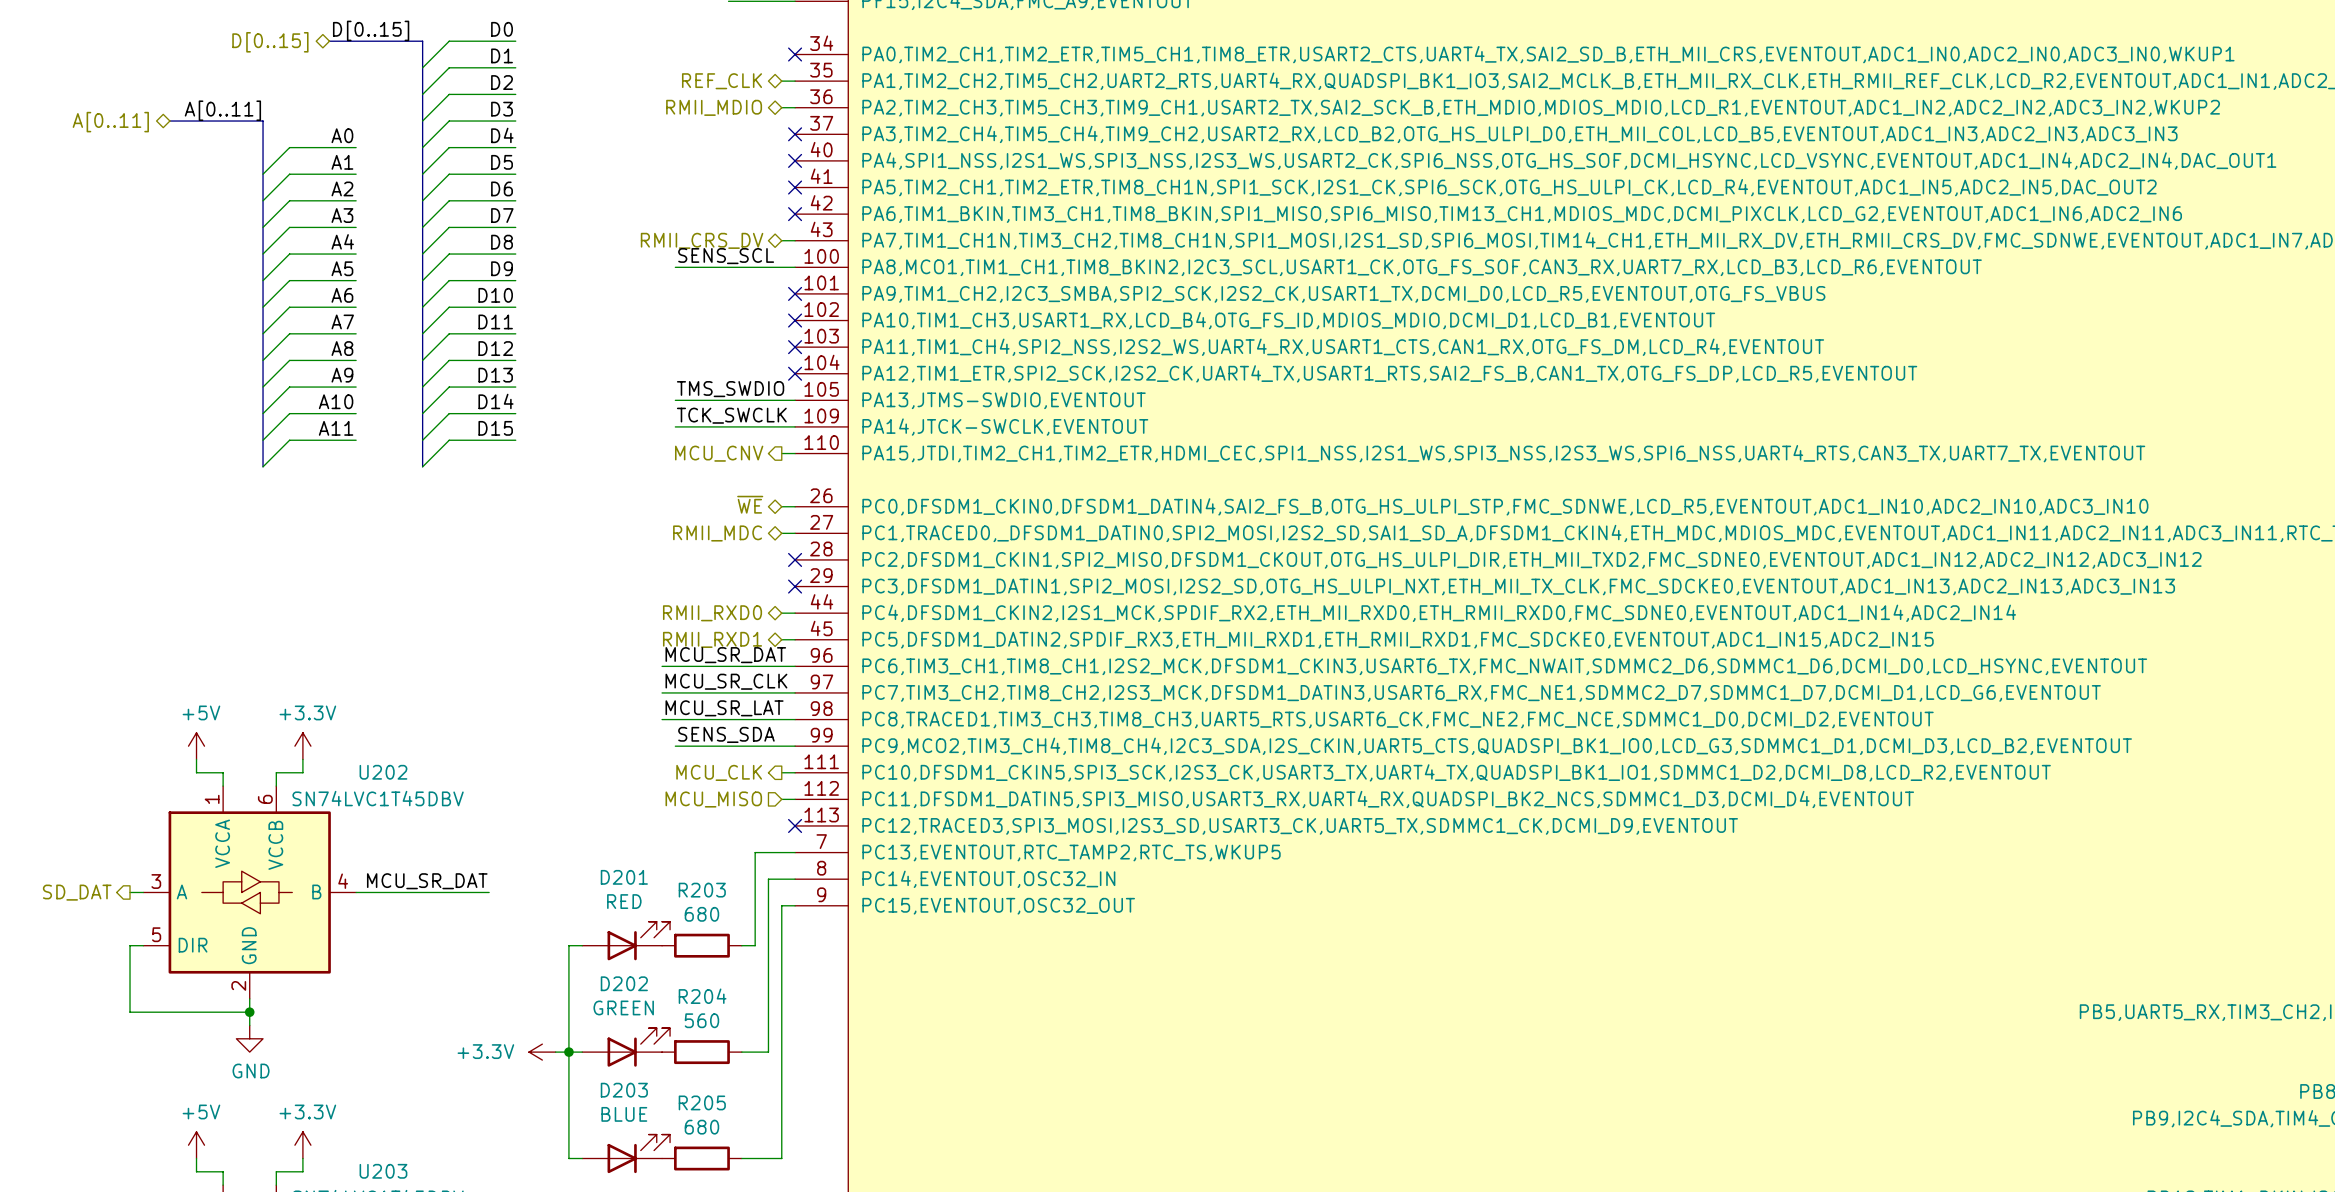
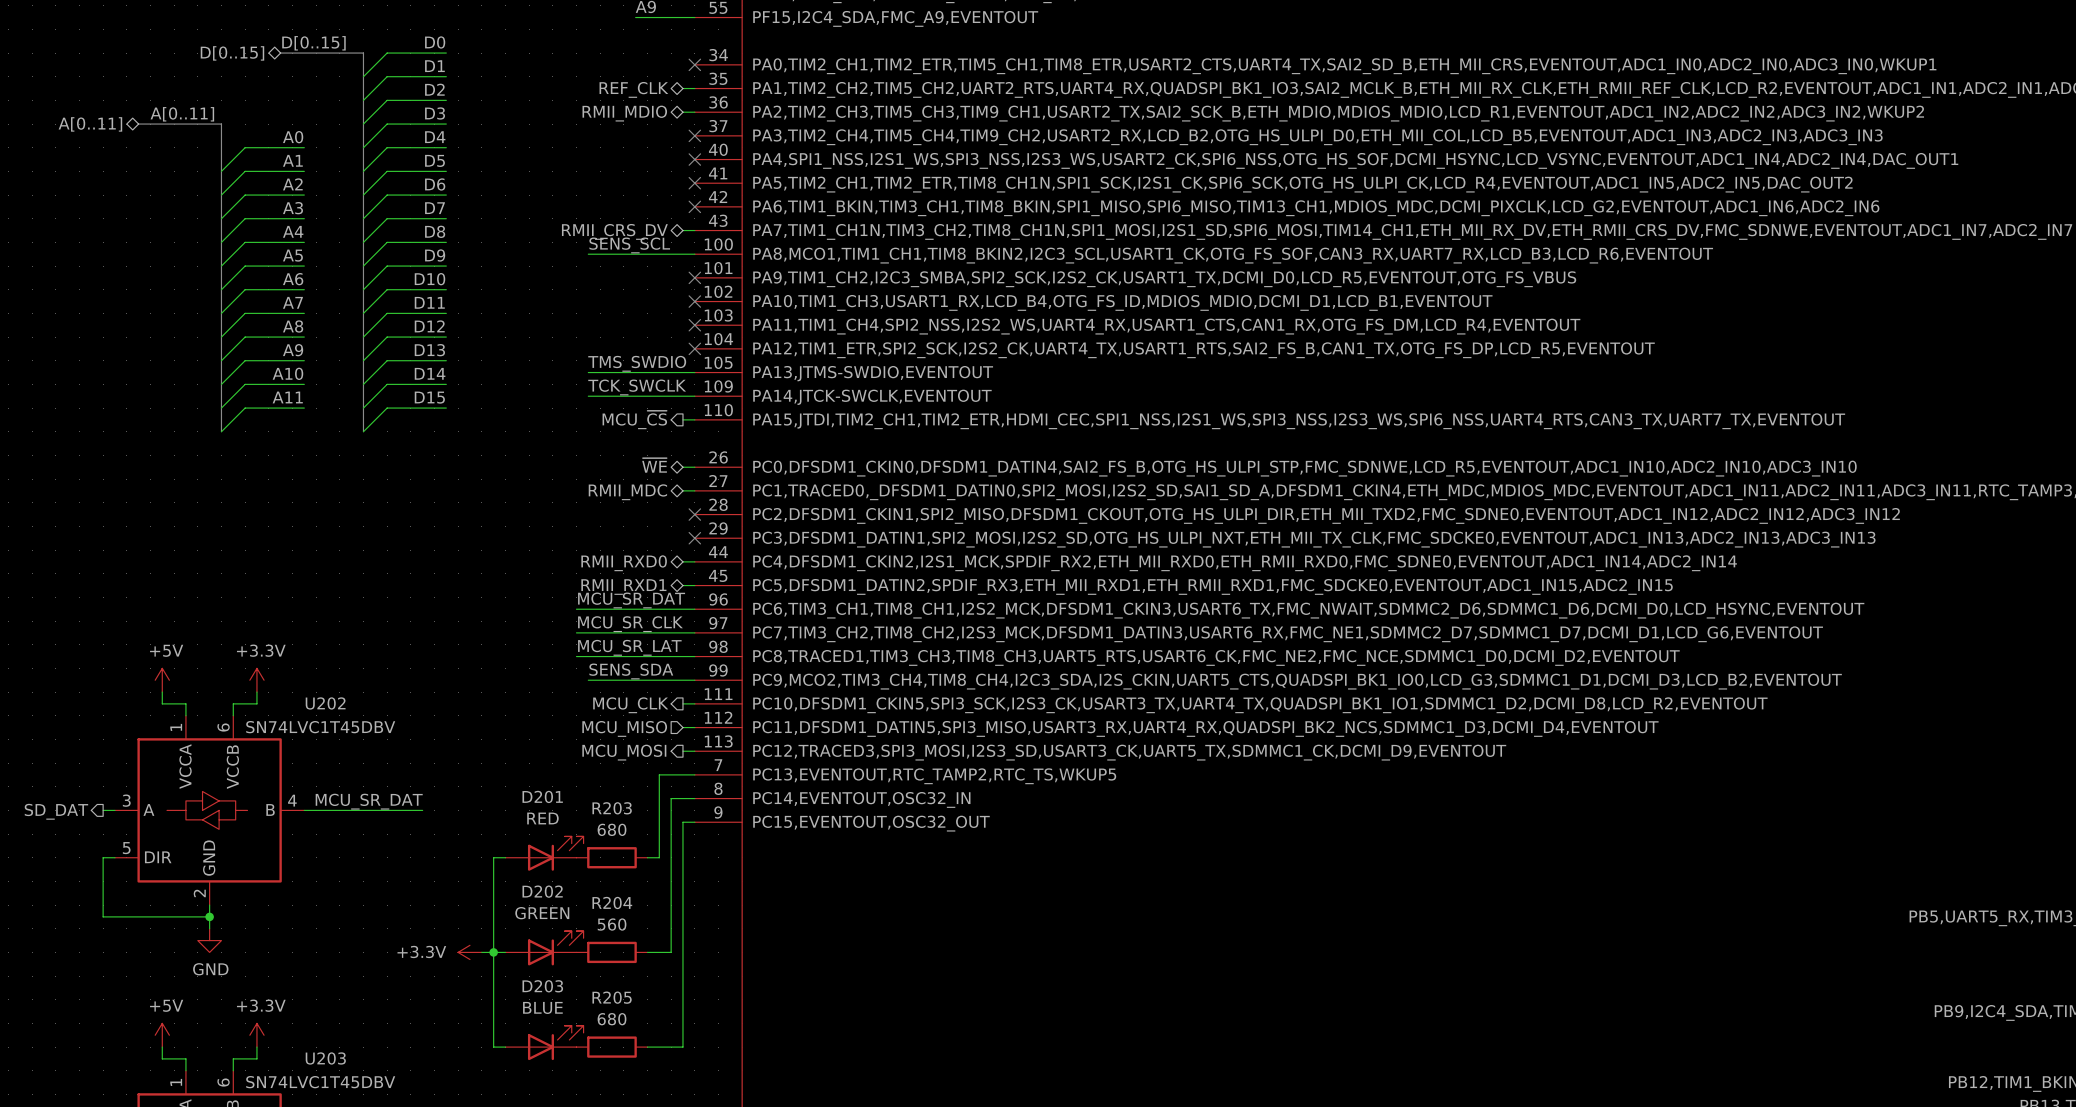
hierarchical label: MCU_CNV (719, 453) -> MCU_~{CS} (634, 419)
wire: none -> (682, 751) (694, 751)
no-connect mark: (795, 825) -> none
hierarchical label: none -> MCU_MOSI (624, 752)

